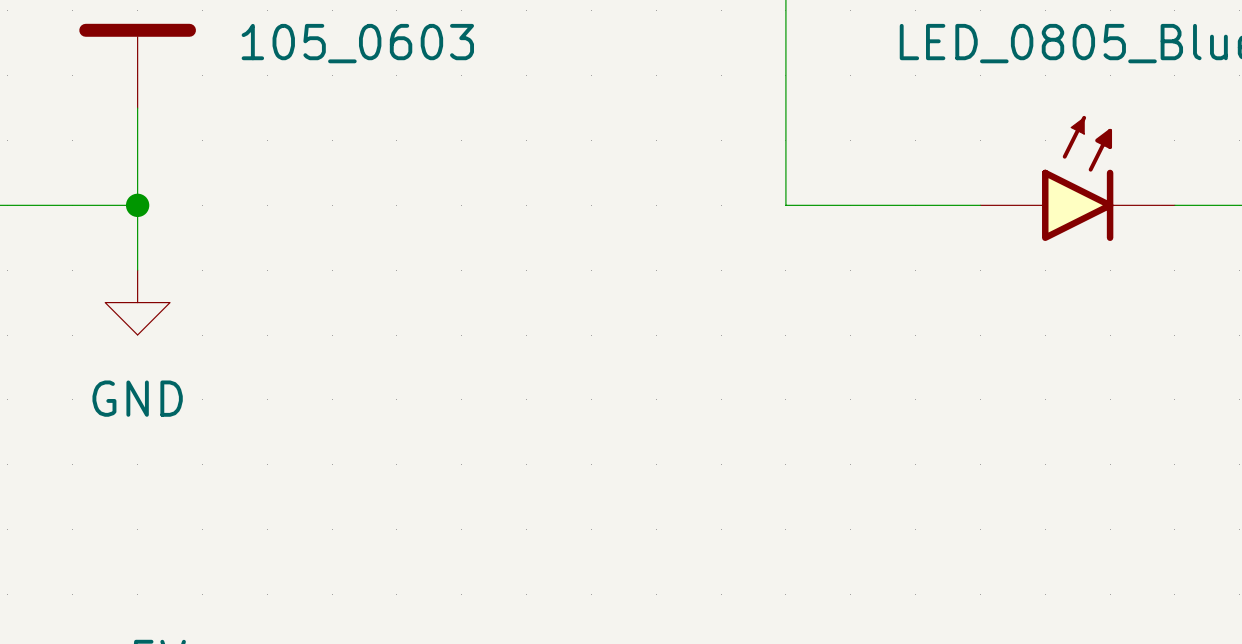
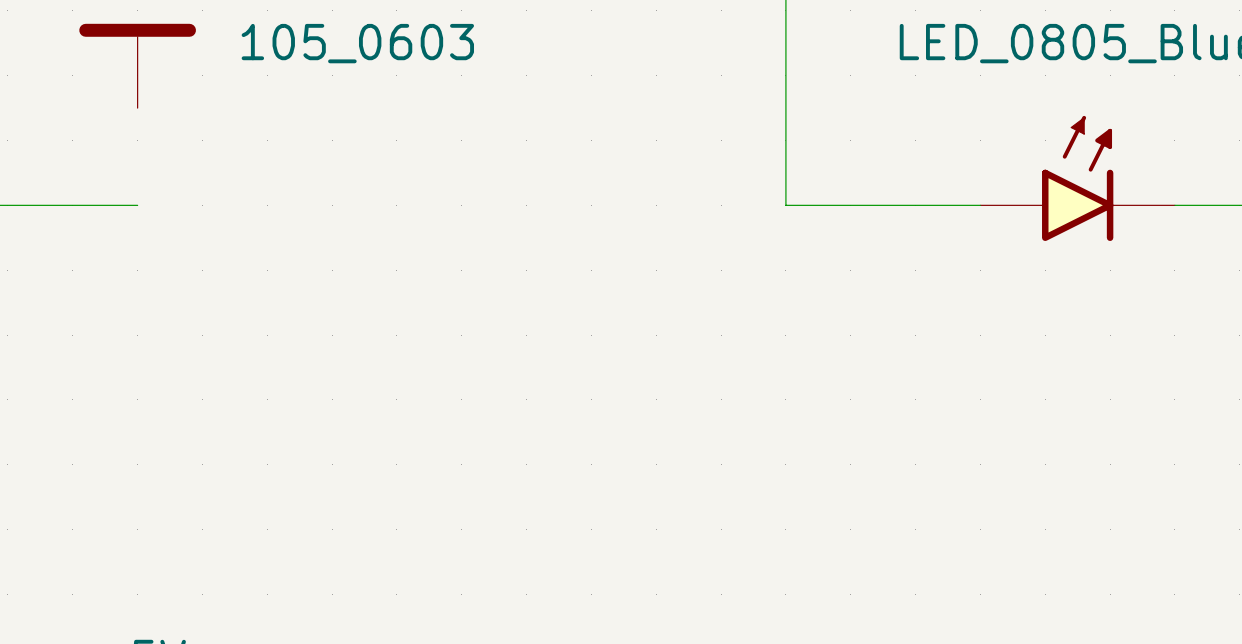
wire: (137, 108) (137, 270) -> none
junction: (137, 205) -> none
power symbol: GND (137, 302) -> none

